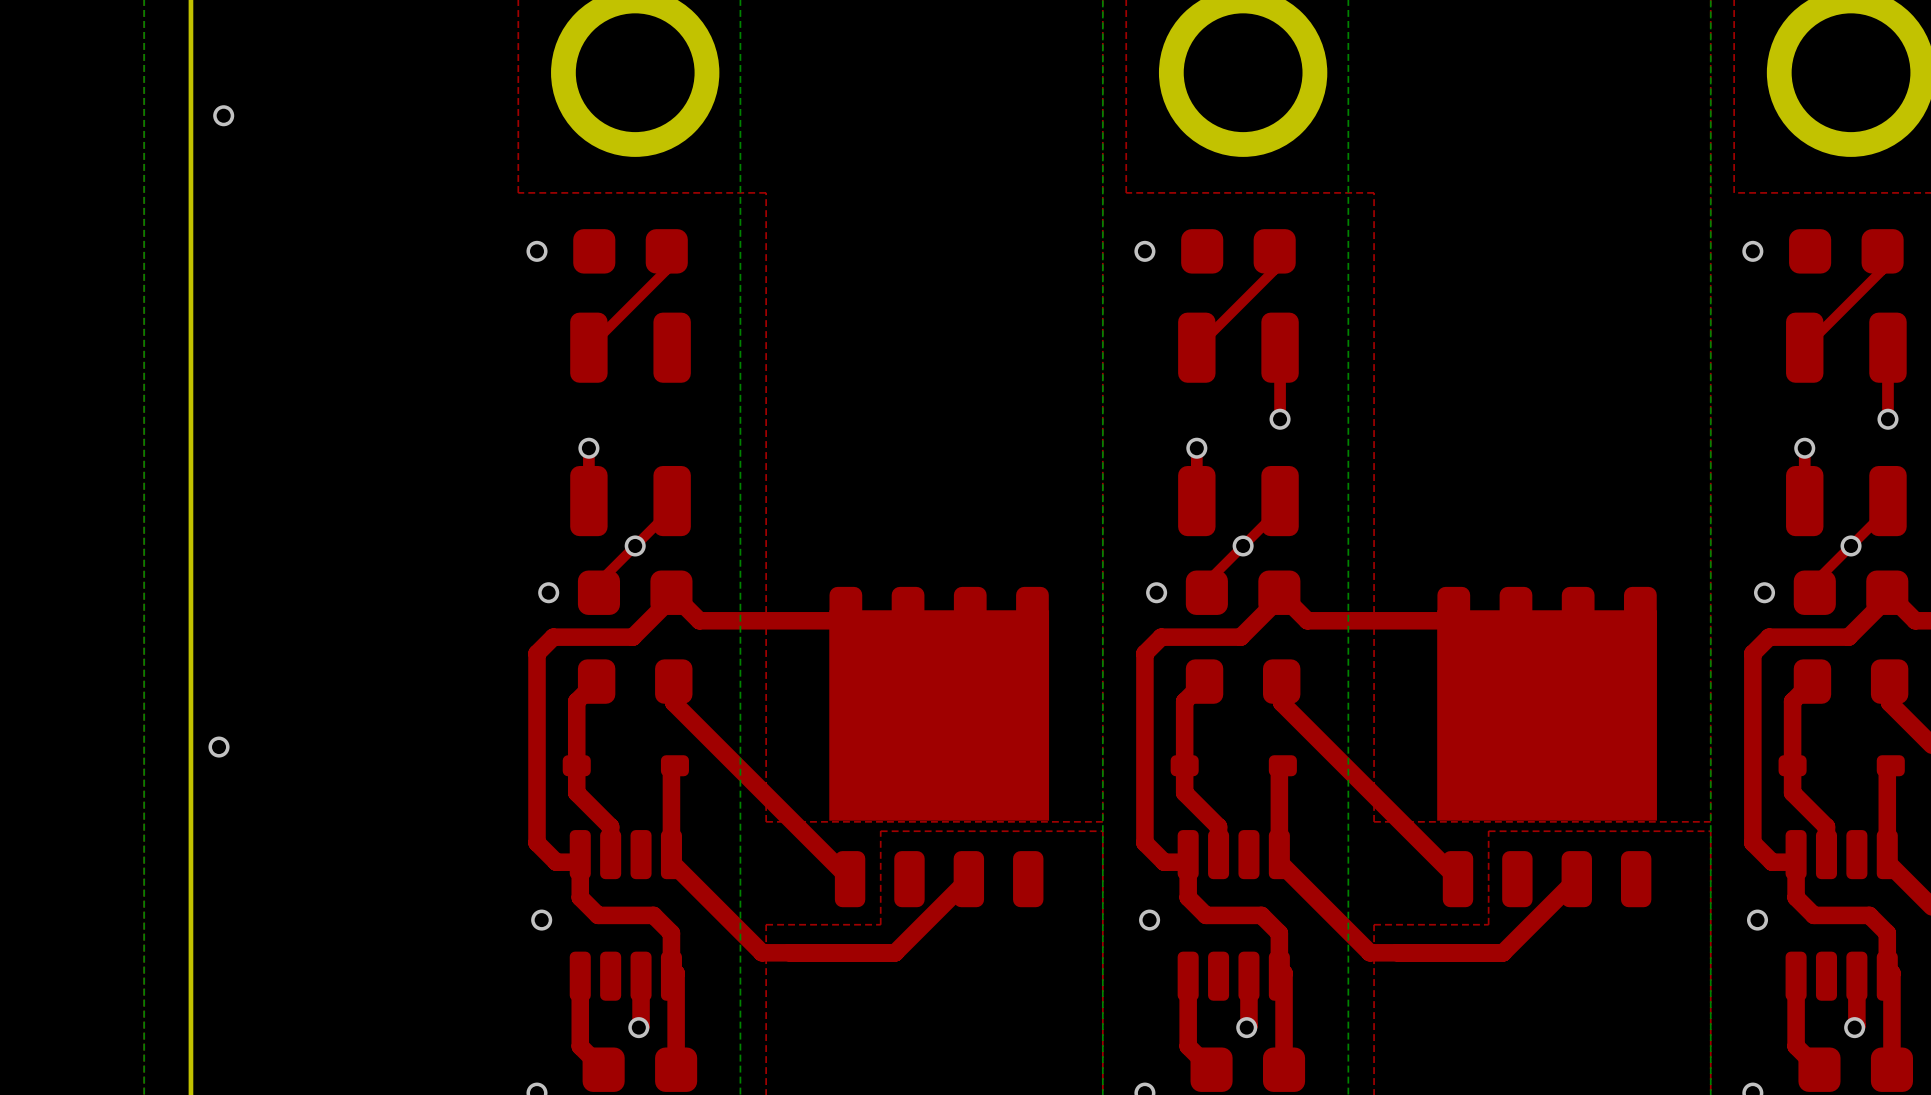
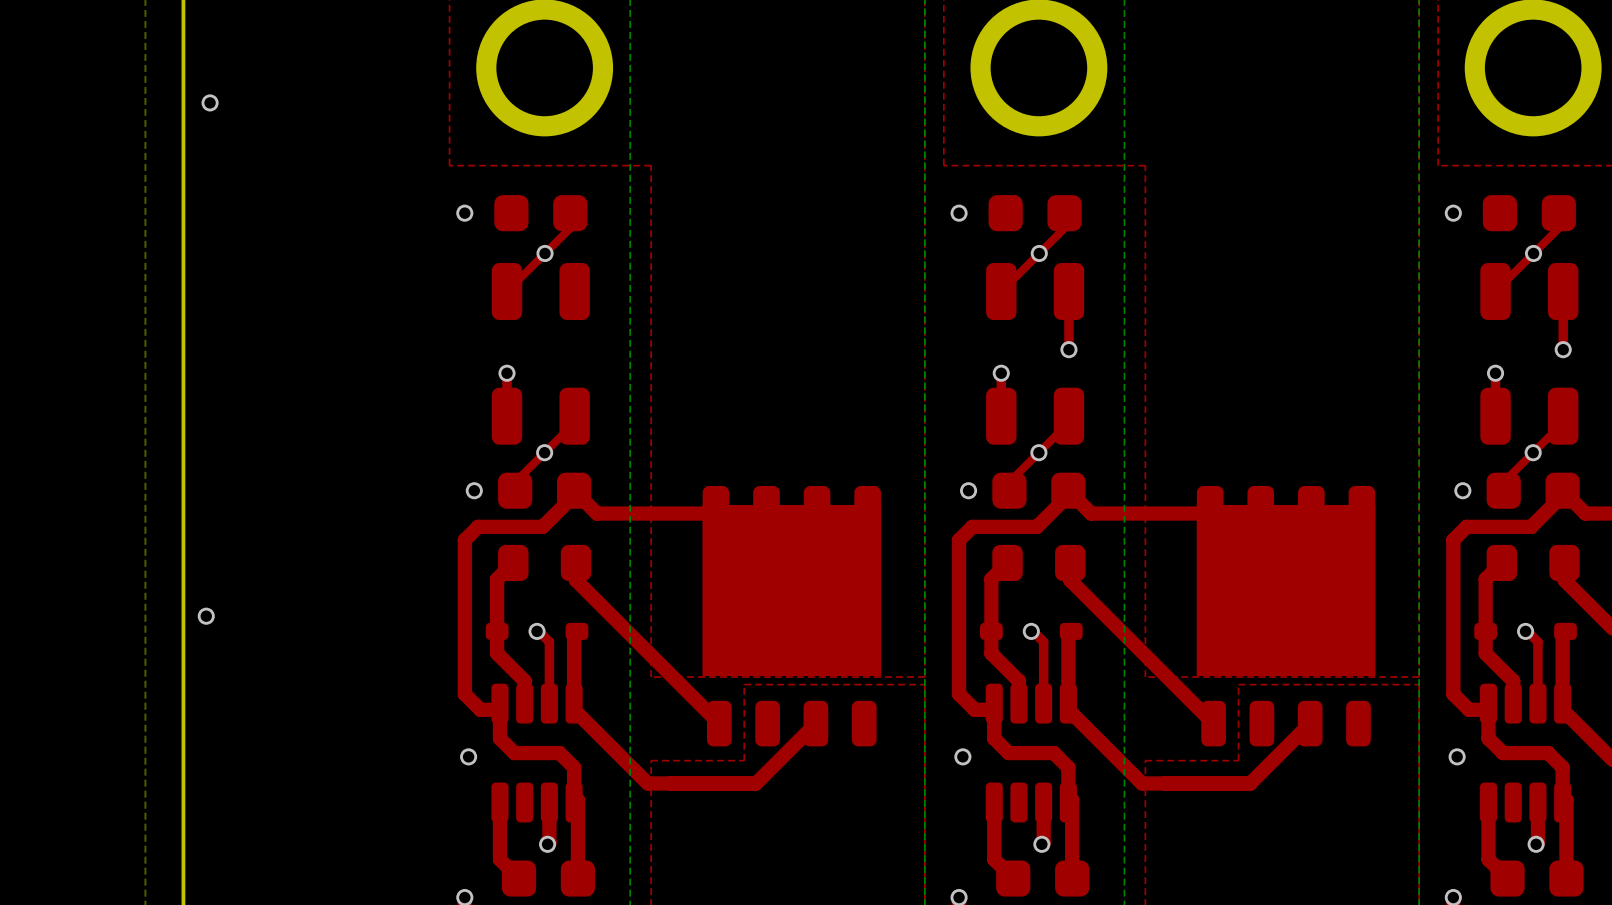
via: none -> (545, 253)
via: none -> (1039, 253)
via: none -> (1533, 253)
top track: none -> (538, 630) (549, 641) (549, 709)
top track: none -> (1032, 630) (1043, 641) (1043, 709)
top track: none -> (1526, 630) (1537, 641) (1537, 709)
via: none -> (537, 631)
via: none -> (1031, 631)
via: none -> (1525, 631)

